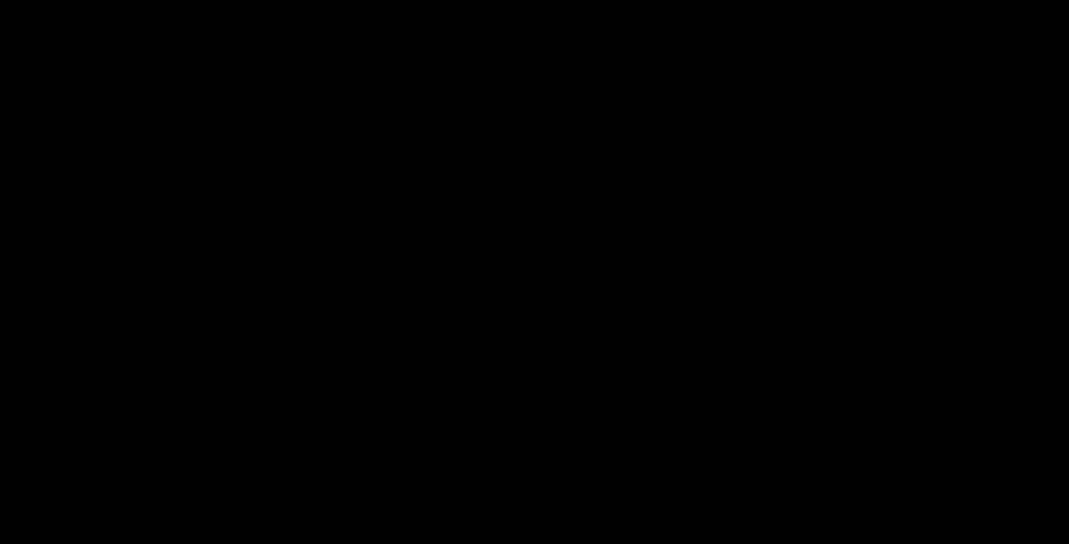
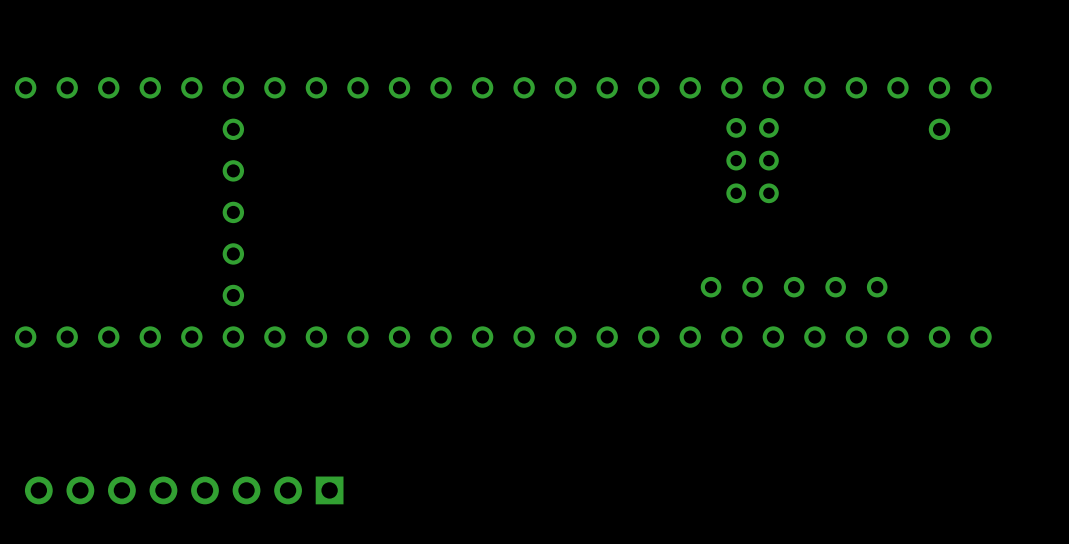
part: none -> (503, 212)
part: none -> (184, 490)

